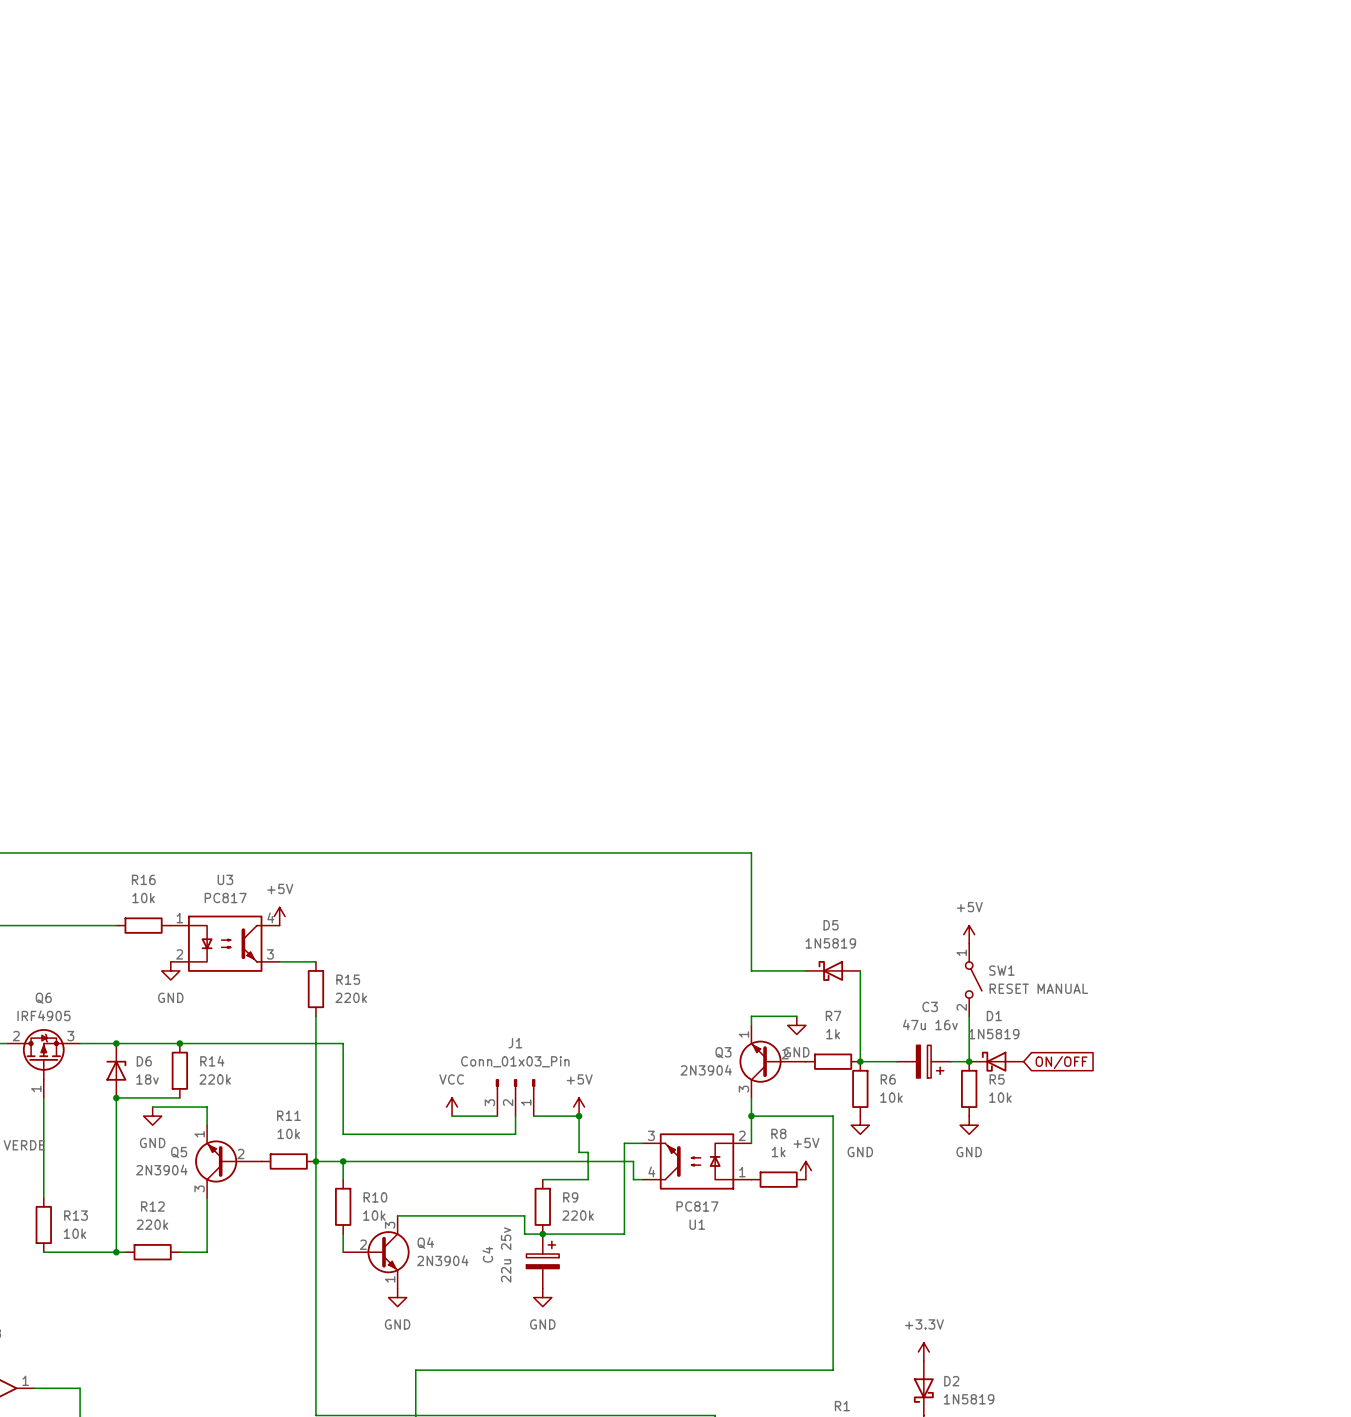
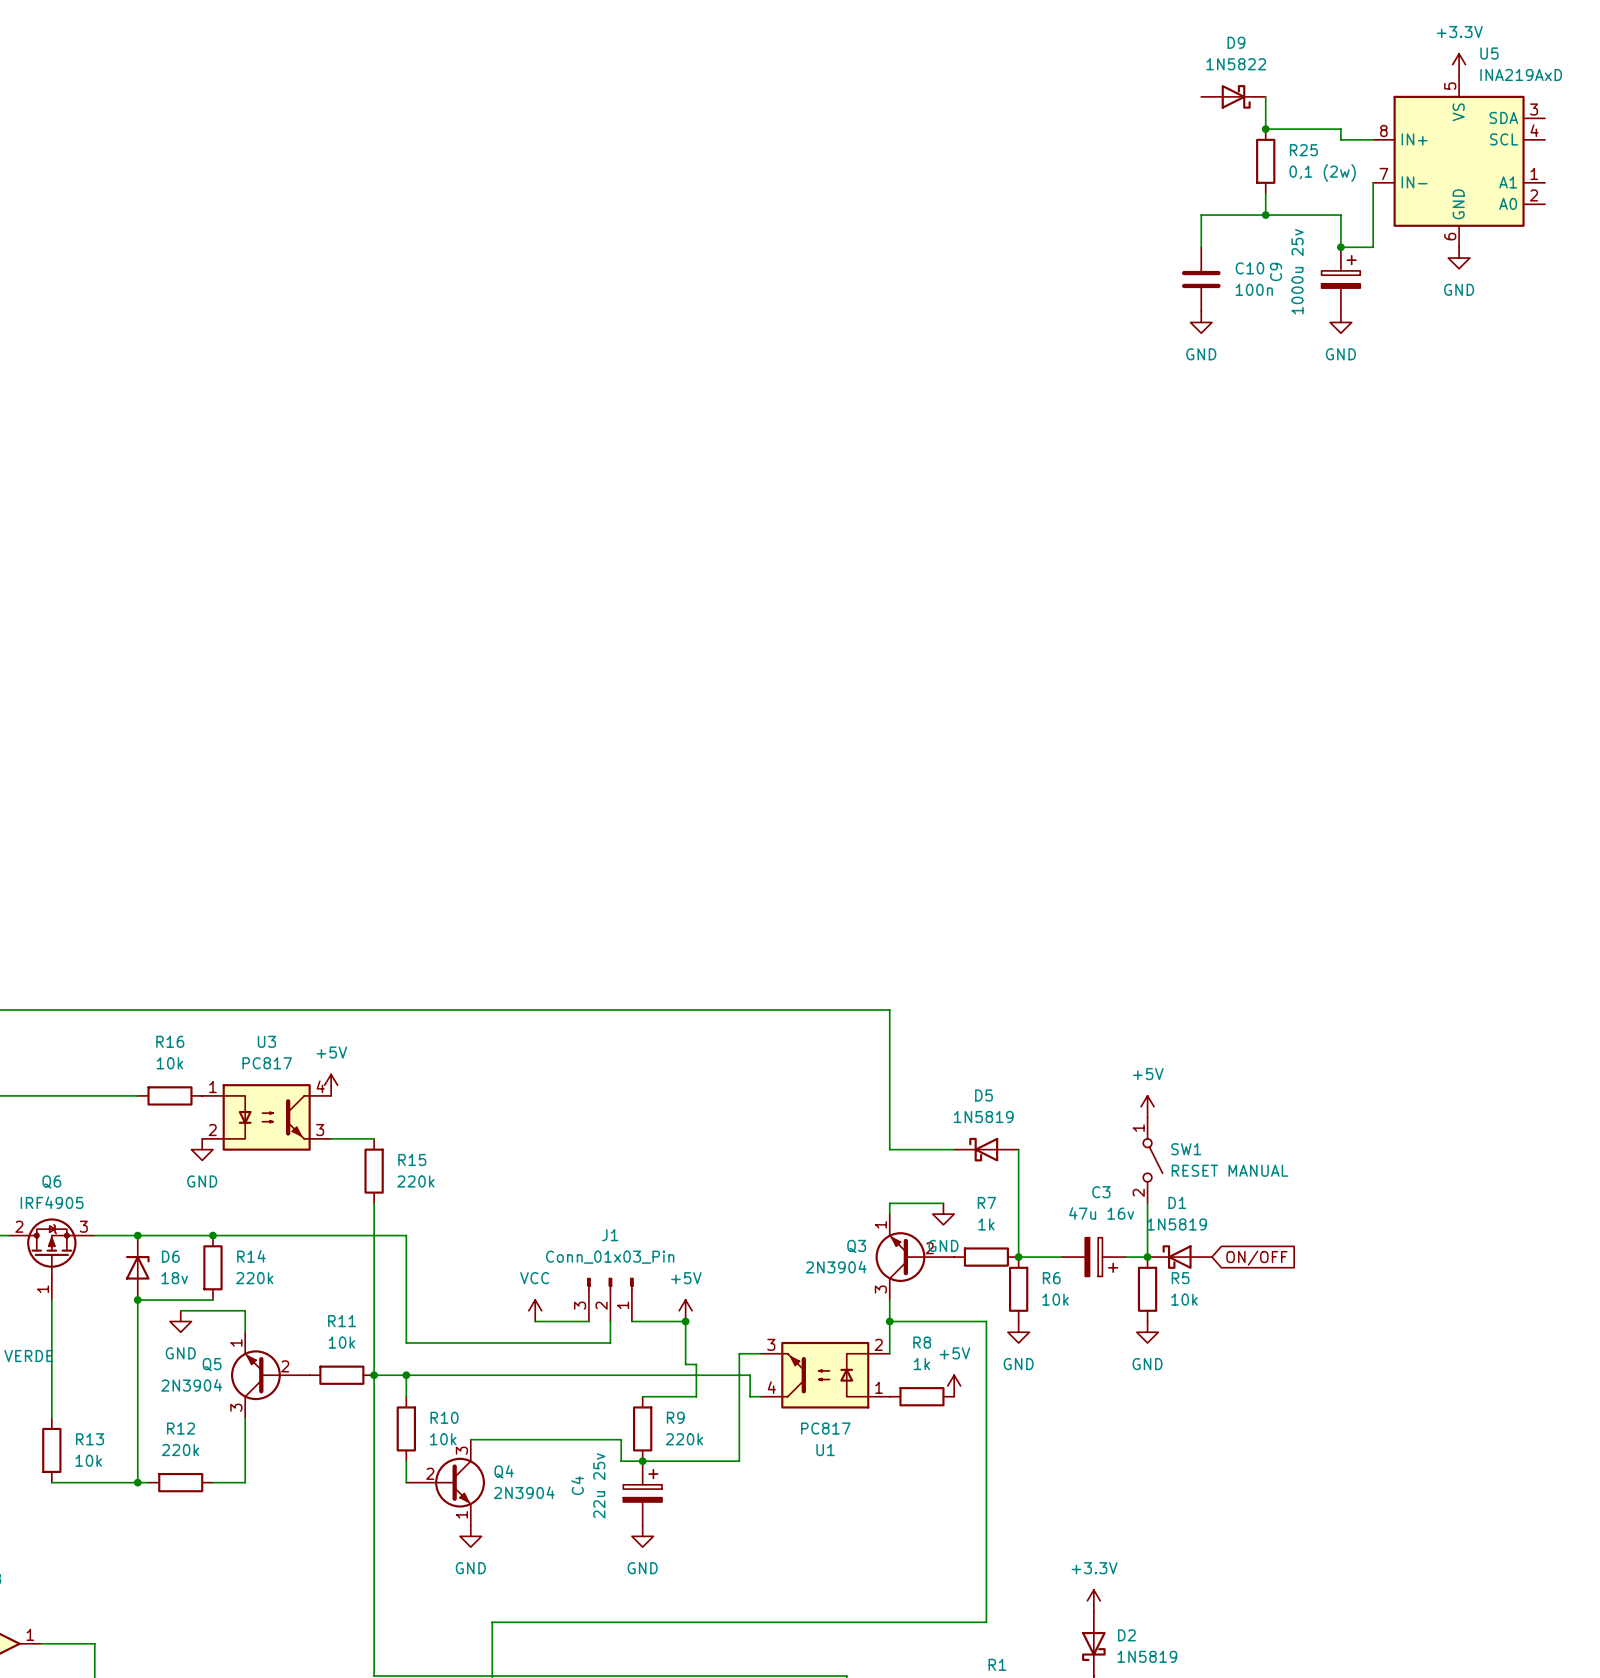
power symbol: none -> +3.3V (1459, 64)
D9: none -> 1N5822 (1233, 96)
wire: none -> (1265, 96) (1265, 129) (1340, 129) (1340, 139) (1373, 139)
junction: none -> (1265, 129)
R25: none -> 0,1 (2w) (1265, 161)
U5: none -> INA219AxD (1459, 161)
wire: none -> (1373, 182) (1373, 247) (1340, 247) (1340, 215) (1201, 215) (1201, 247)
wire: none -> (1265, 193) (1265, 215)
junction: none -> (1265, 215)
junction: none -> (1340, 247)
power symbol: none -> GND (1459, 258)
C10: none -> 100n (1201, 279)
C9: none -> 1000u 25v (1340, 279)
power symbol: none -> GND (1201, 322)
power symbol: none -> GND (1340, 322)

